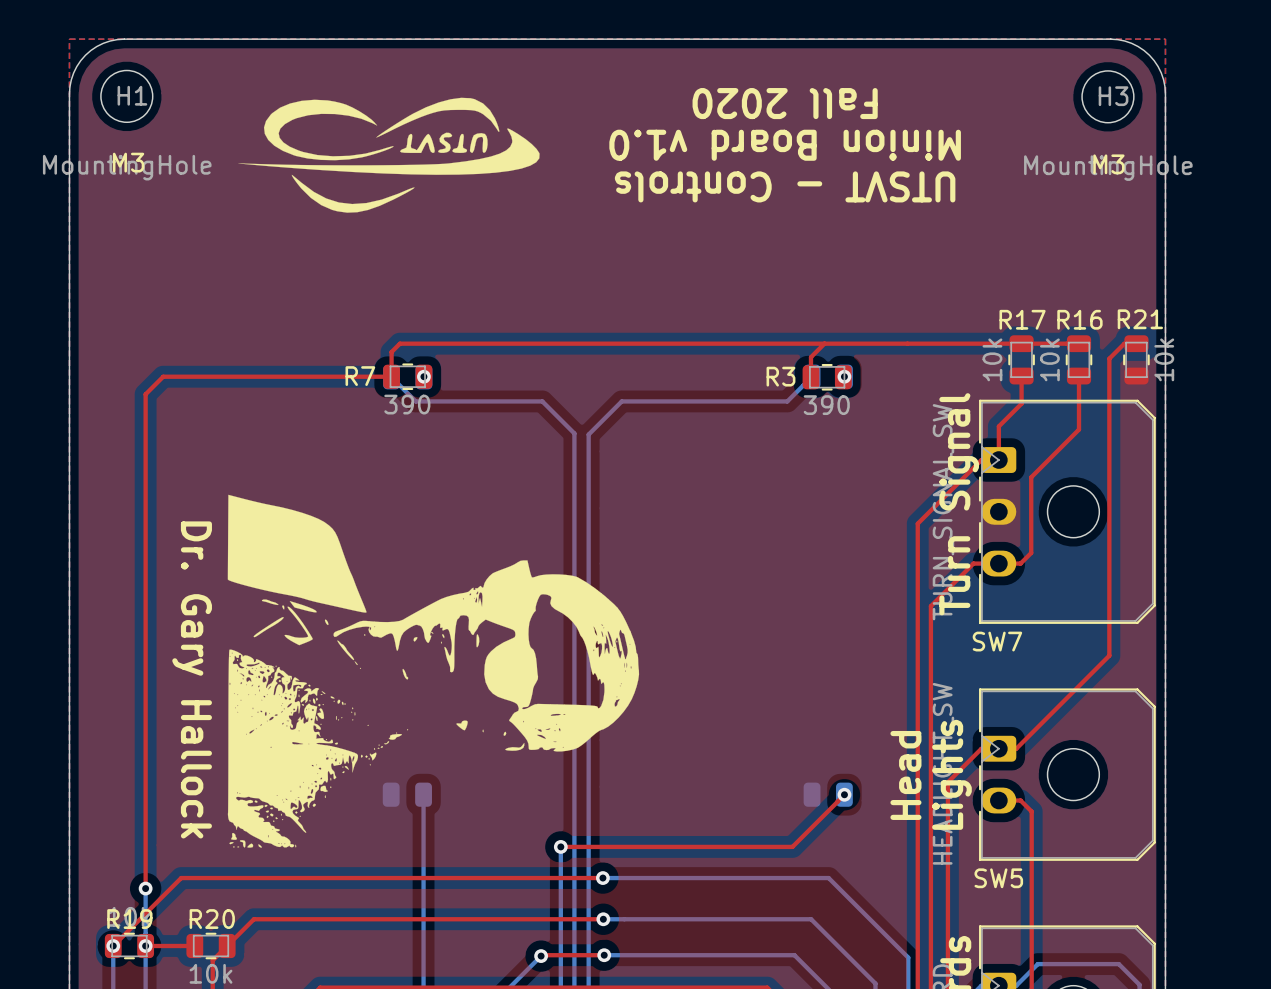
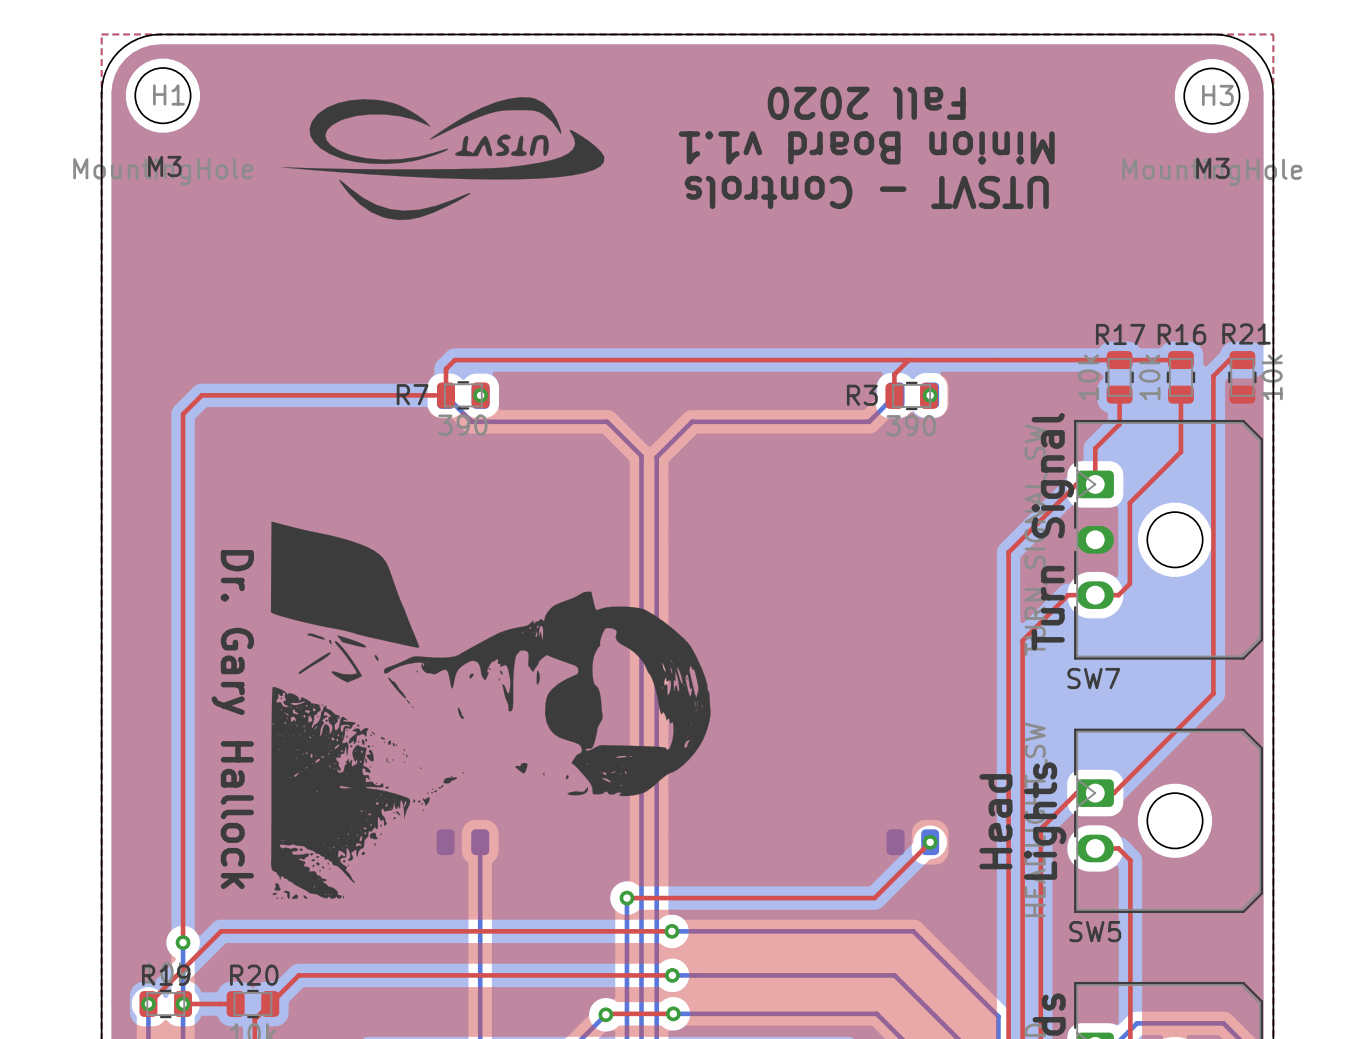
text: Minion Board v1.0 (785, 145) -> Minion Board v1.1 (866, 147)

